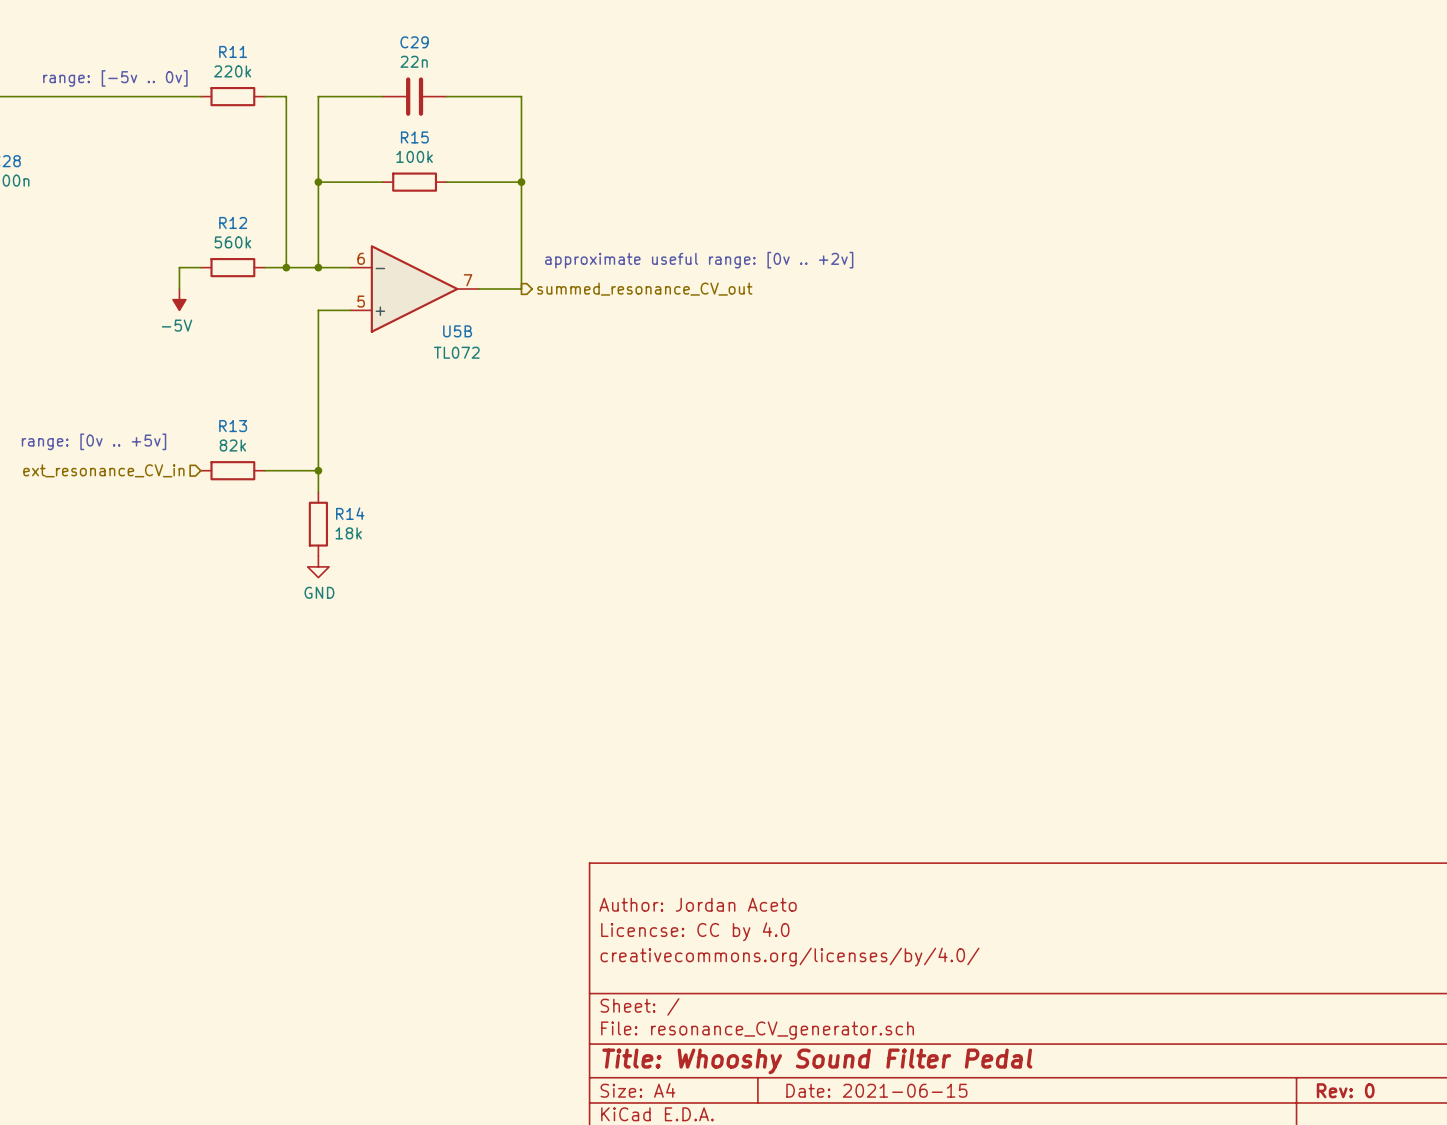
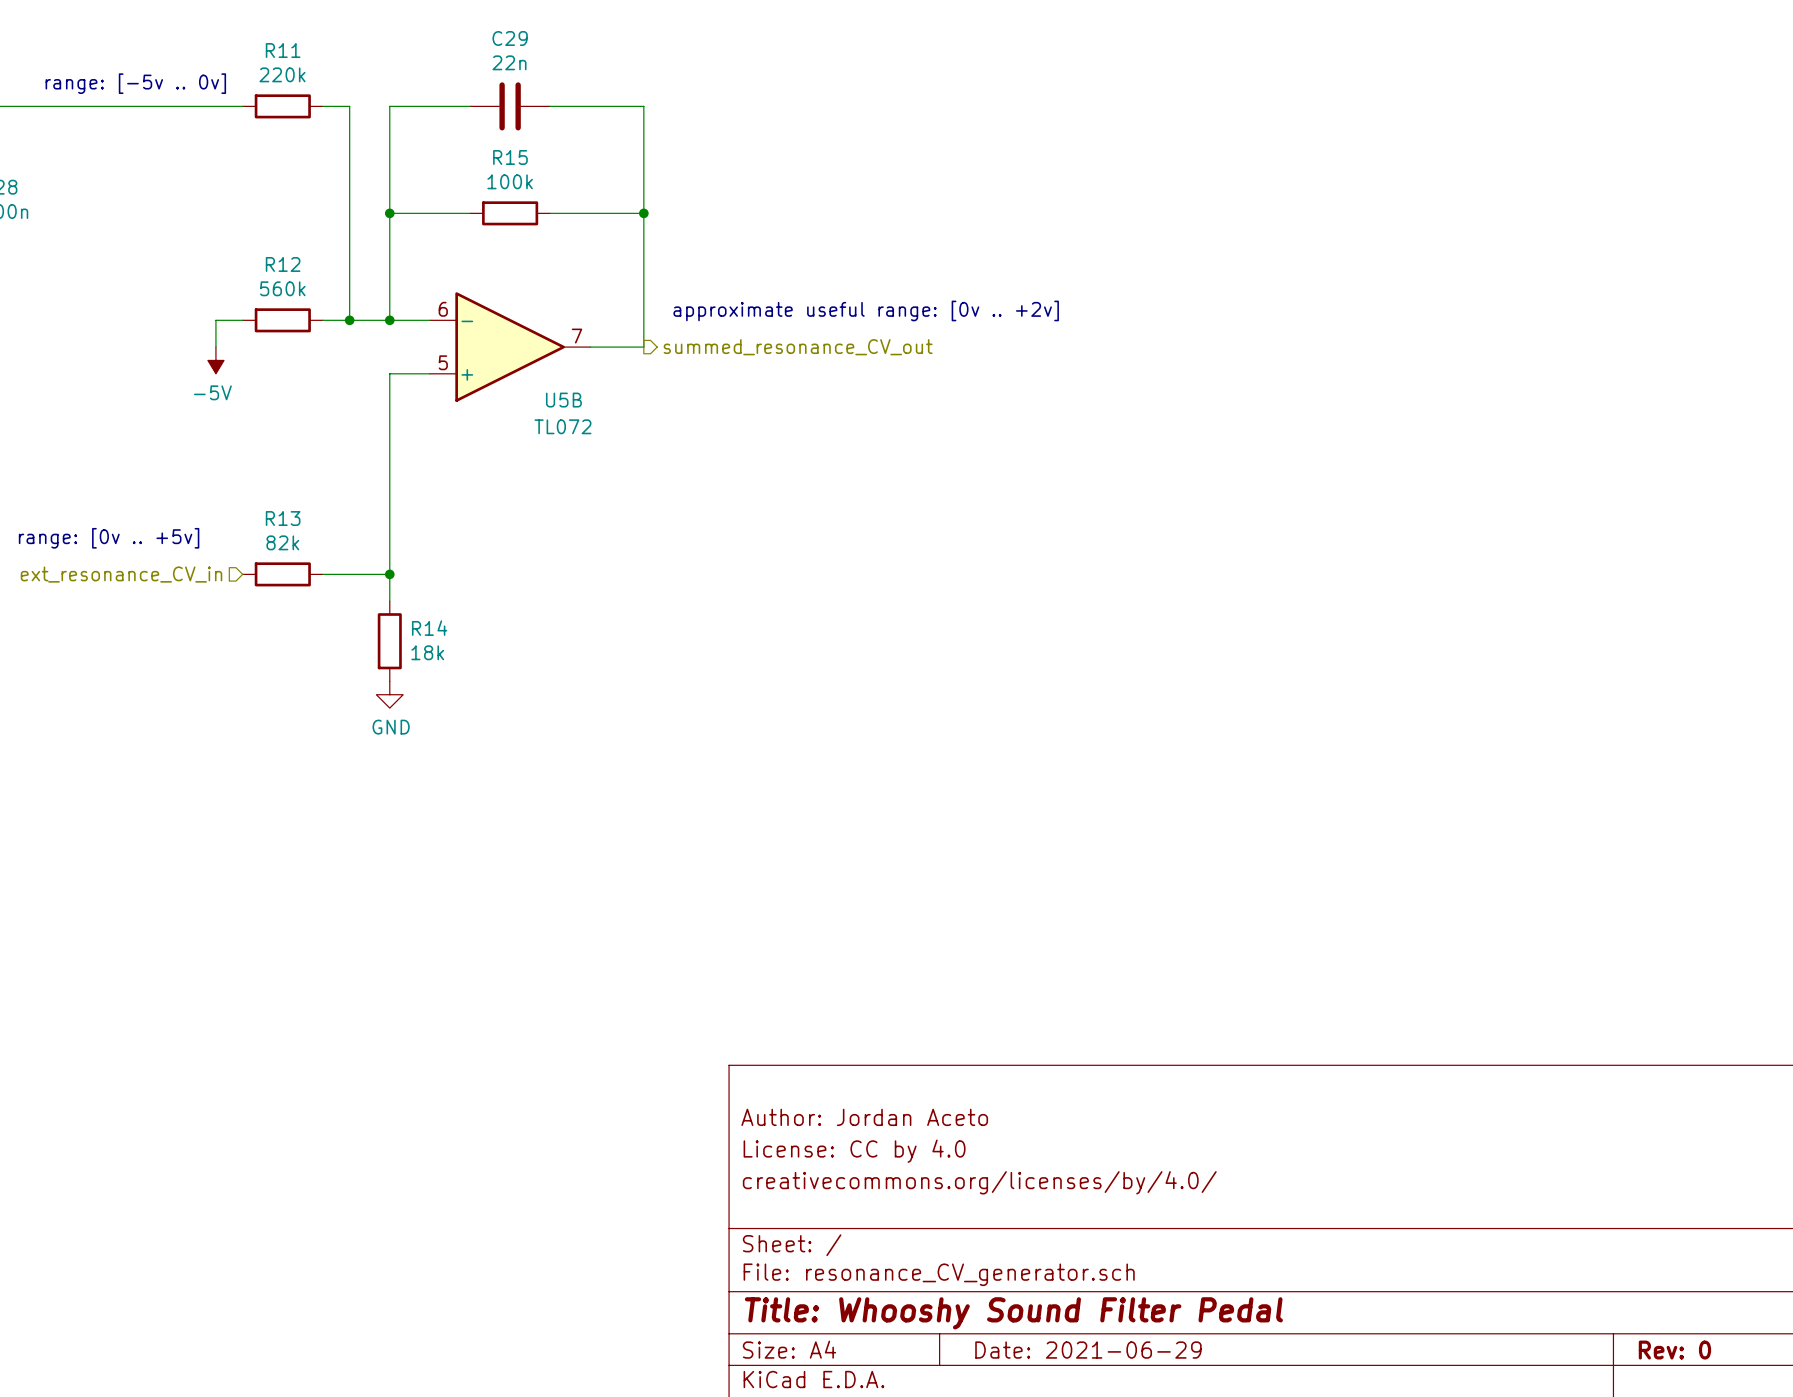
title block: Licencse: CC by 4.0 (695, 931) -> License: CC by 4.0 (854, 1151)
title block: Date: 2021-06-15 (876, 1090) -> Date: 2021-06-29 (1088, 1350)

